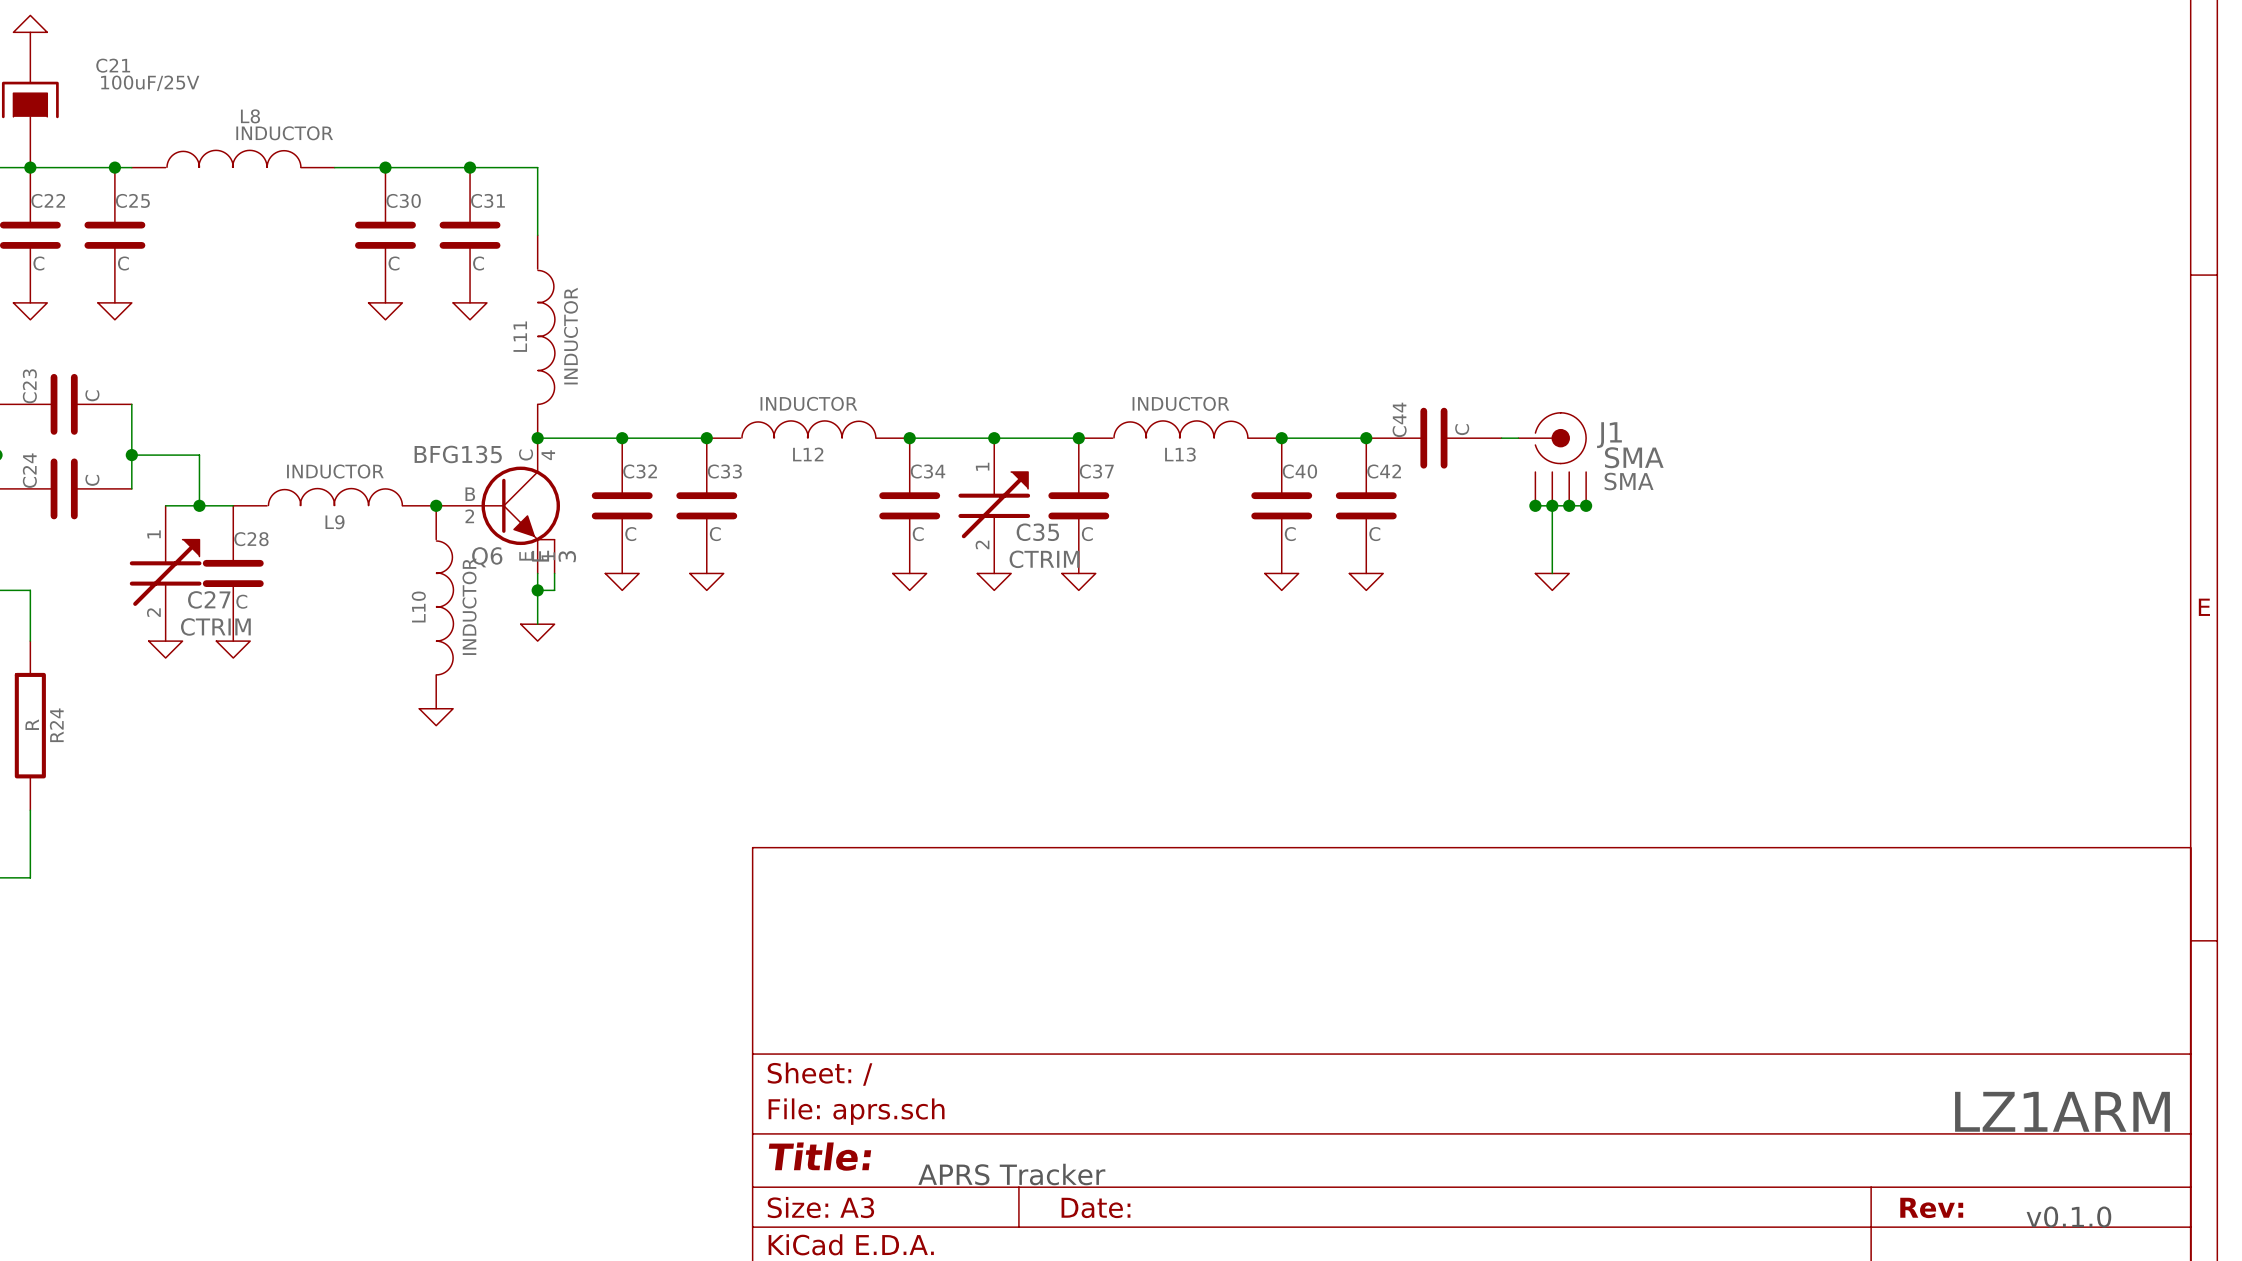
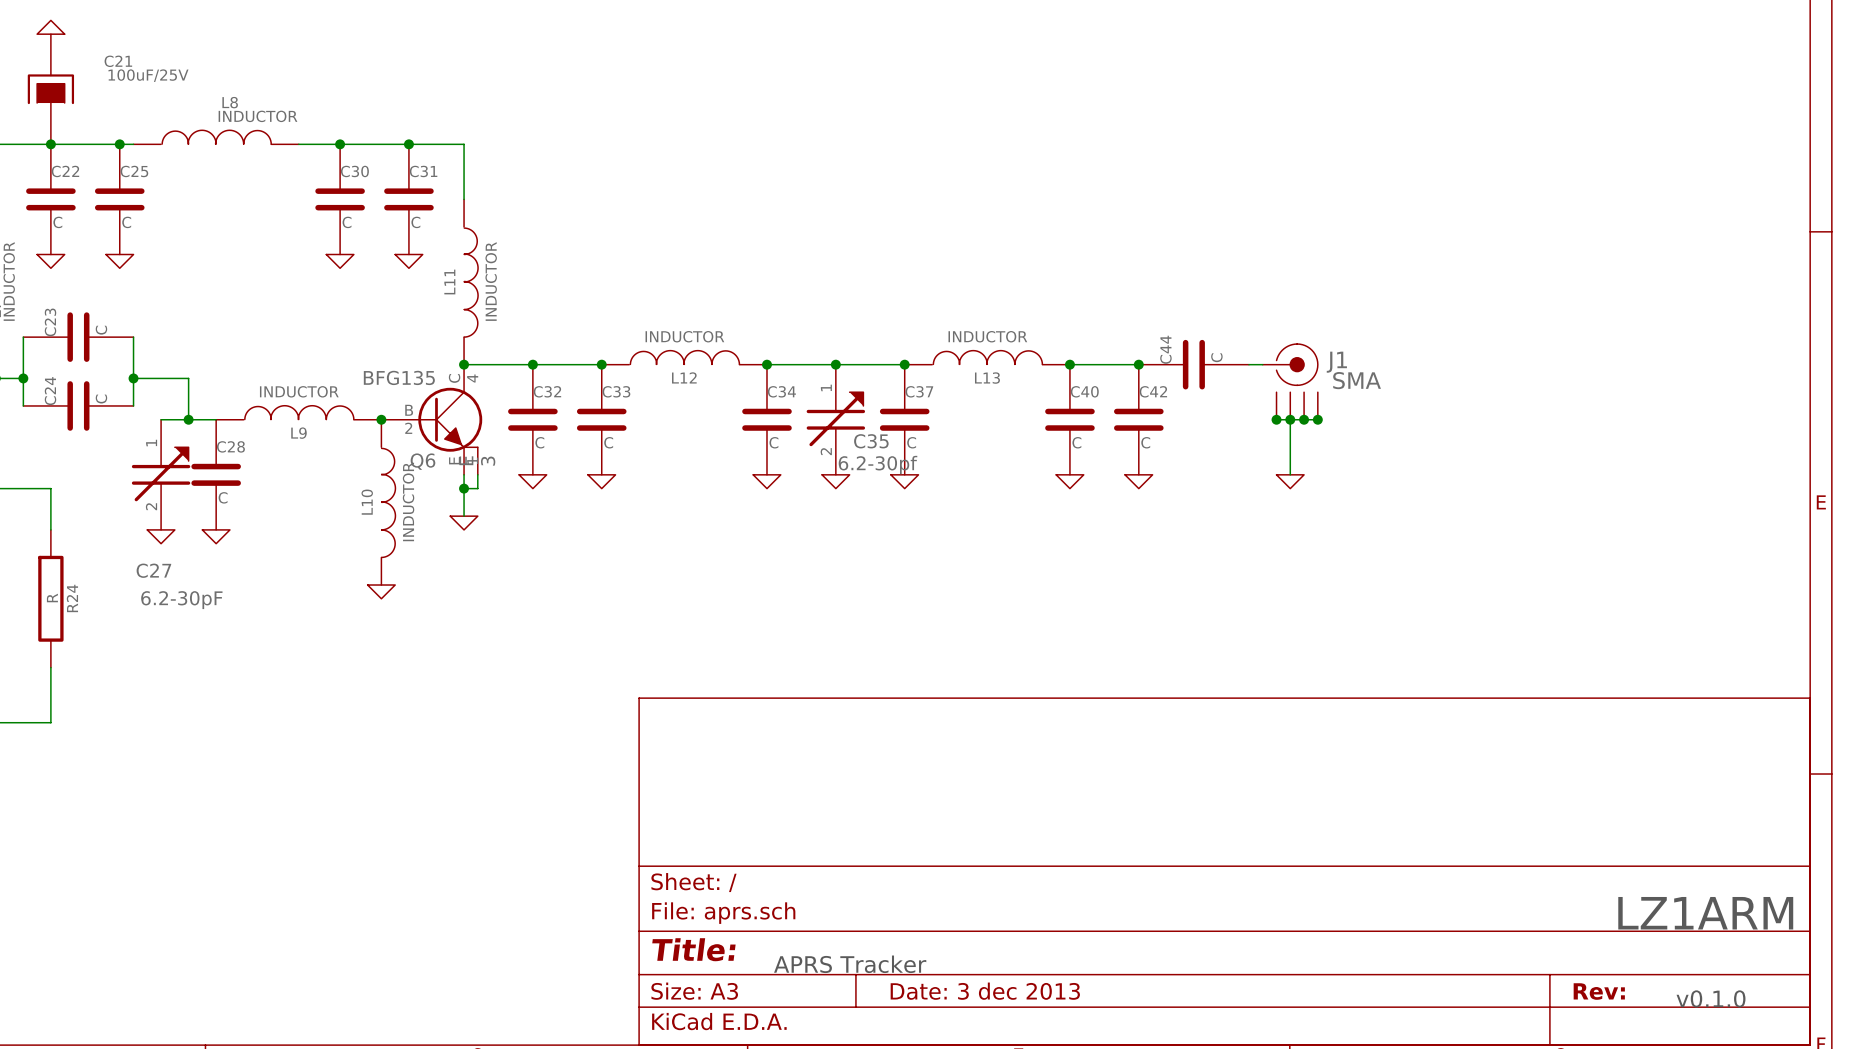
J1 text: SMA (1629, 481) -> none
C35 value: CTRIM (1044, 559) -> 6.2-30pf (878, 464)
C27 name position: C27 (209, 599) -> C27 (153, 570)
C27 value: CTRIM (215, 626) -> 6.2-30pF (181, 600)
title block: Date: (1095, 1207) -> Date: 3 dec 2013 (985, 991)

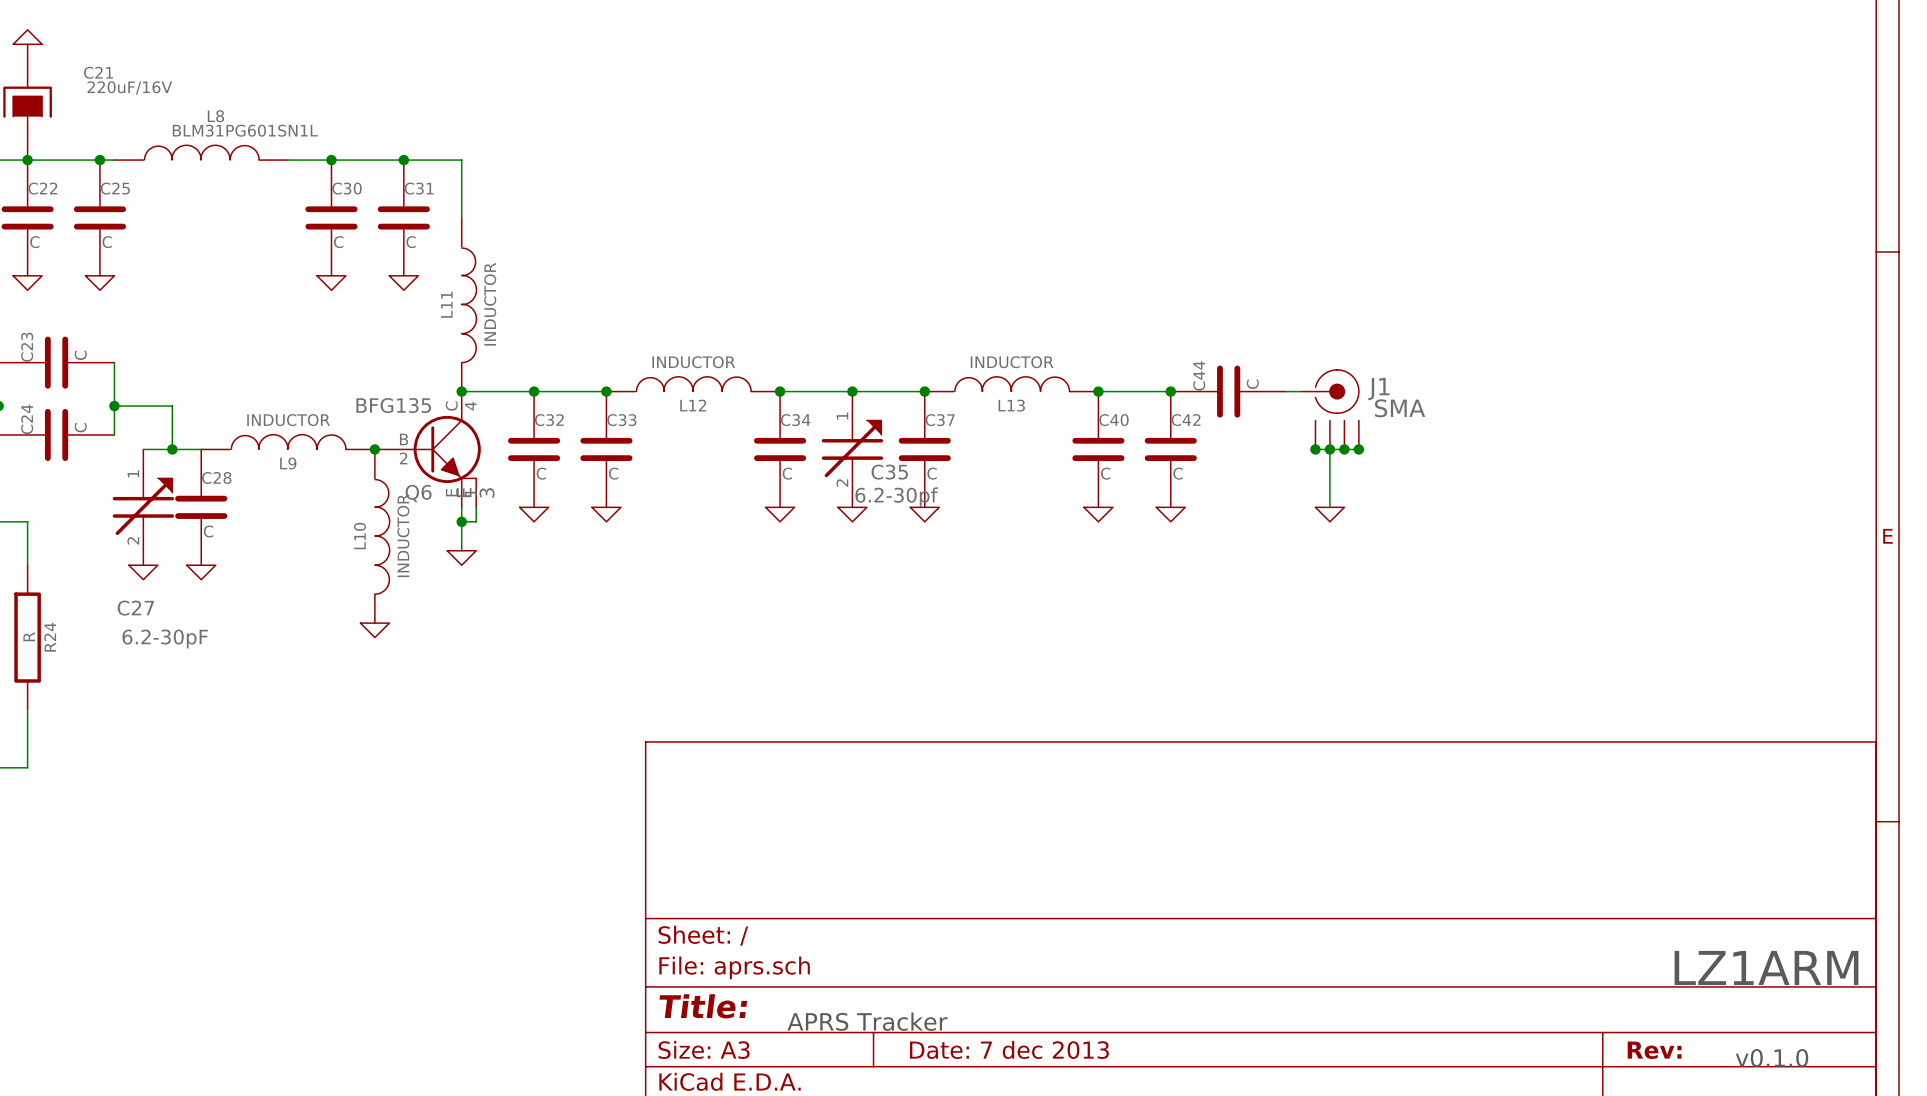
C21 value: 100uF/25V (148, 75) -> 220uF/16V (129, 87)
L8 value: INDUCTOR (257, 116) -> BLM31PG601SN1L (245, 130)
title block: Date: 3 dec 2013 (985, 991) -> Date: 7 dec 2013 (1009, 1049)

